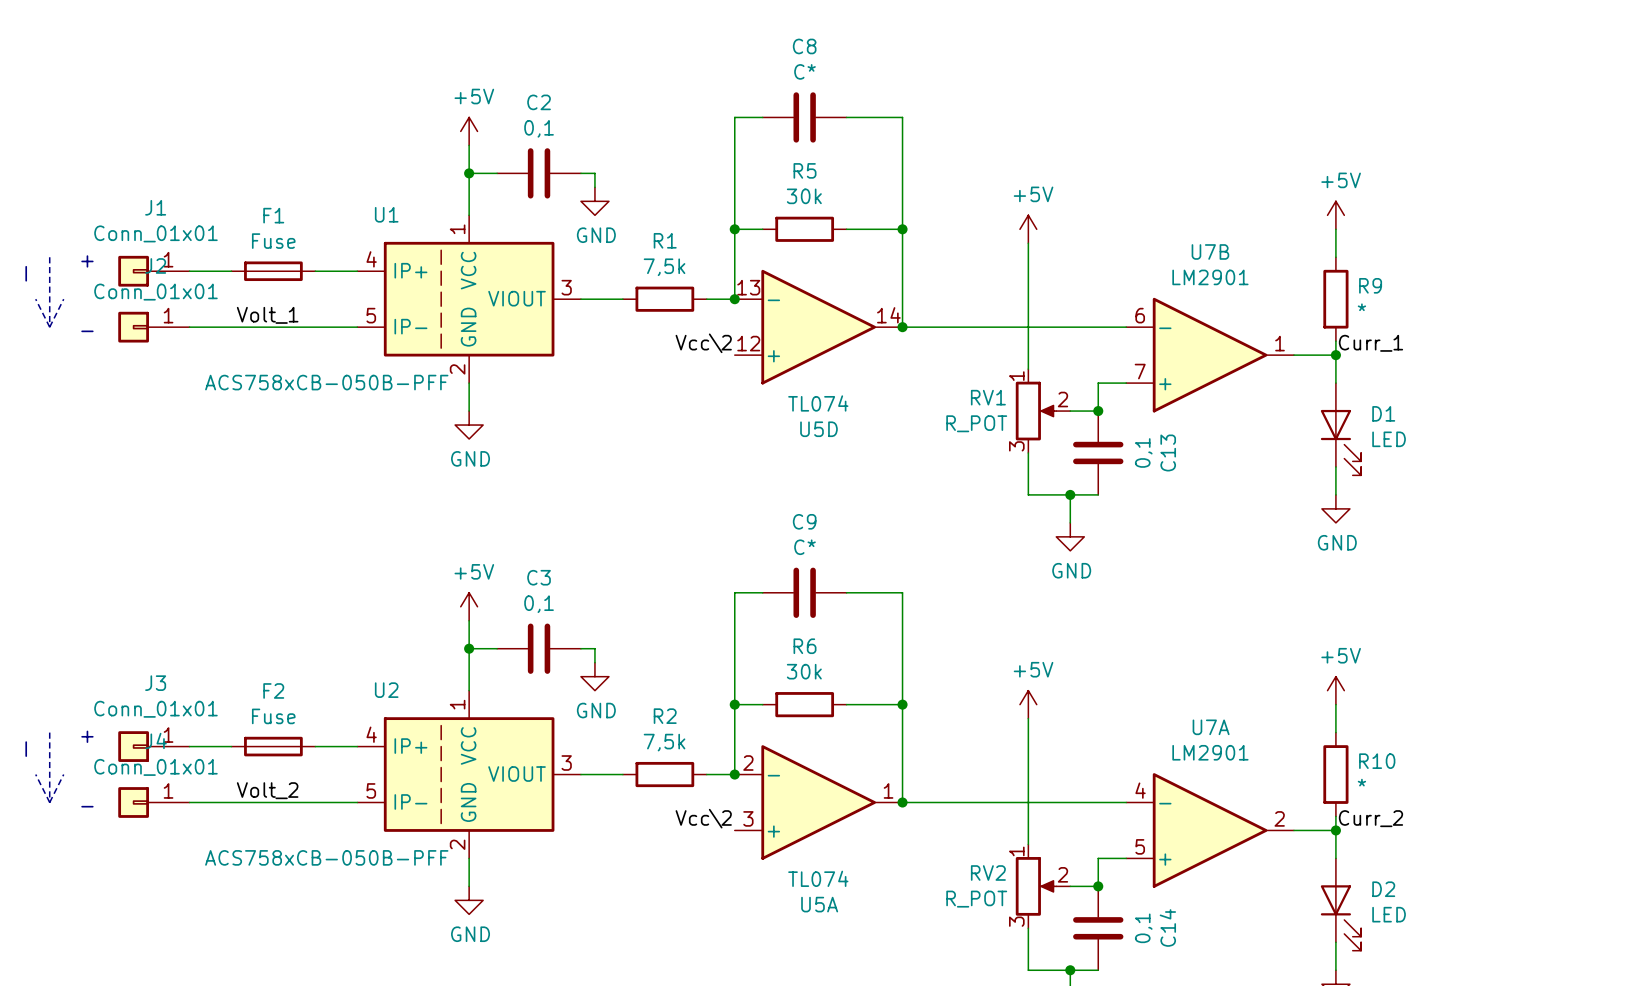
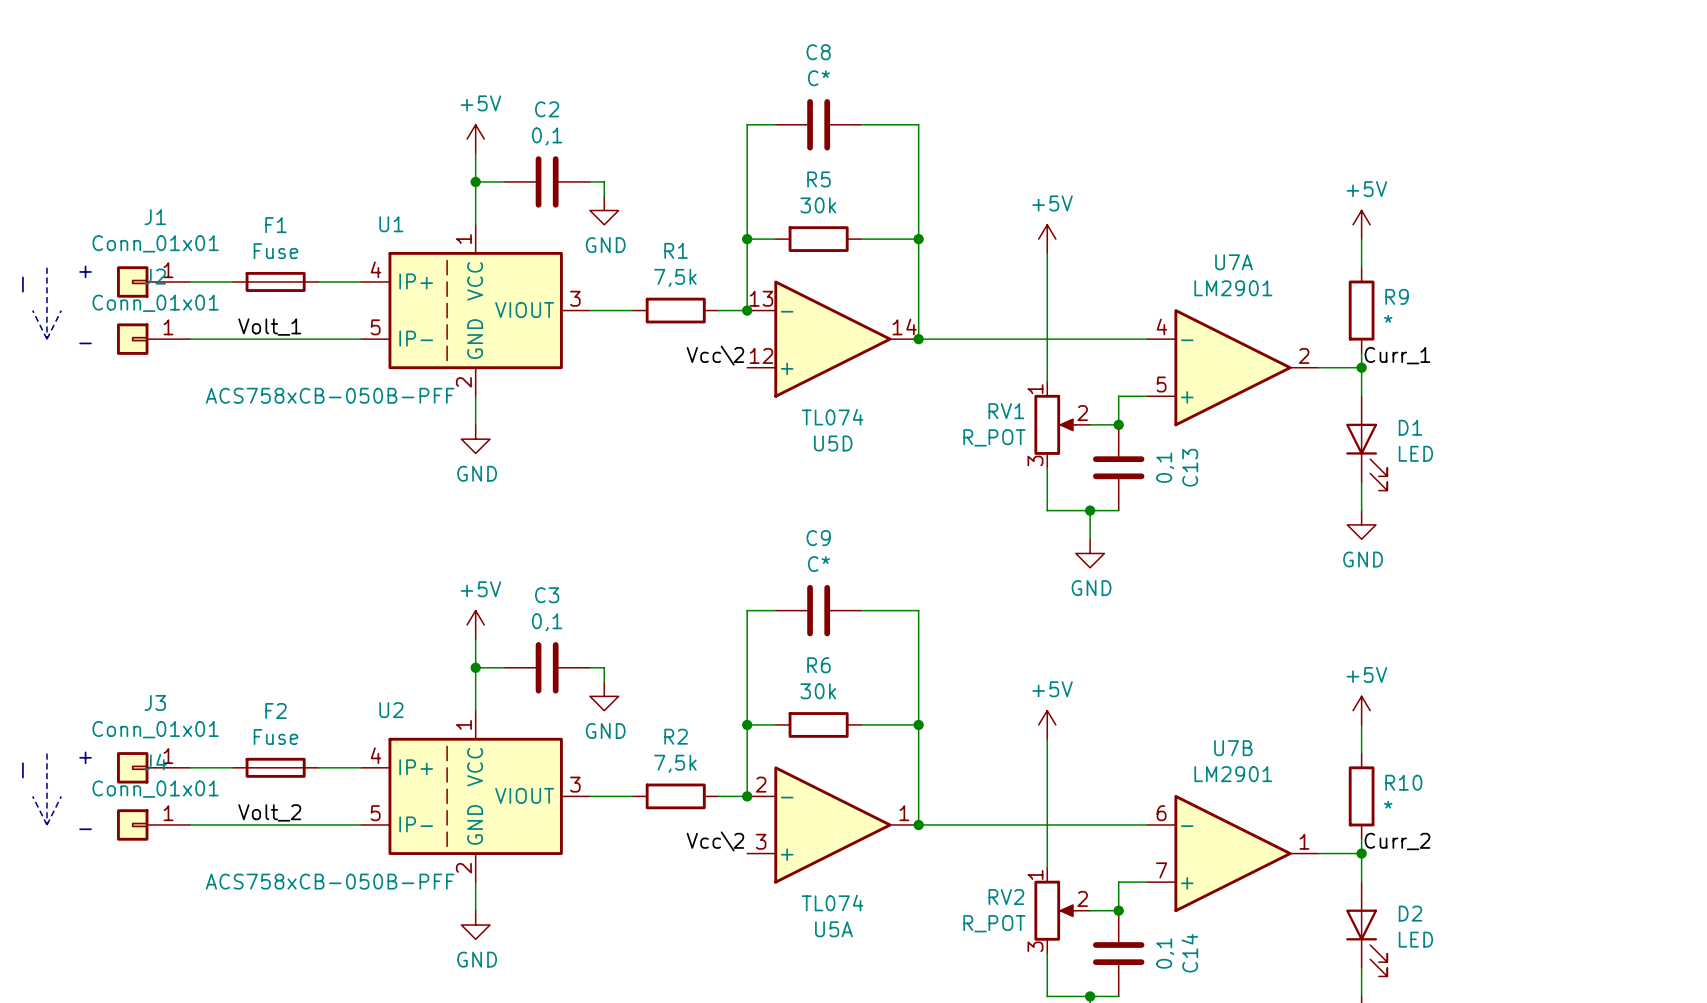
U7B position: (1210, 355) -> (1233, 853)
U7A position: (1210, 830) -> (1233, 367)

